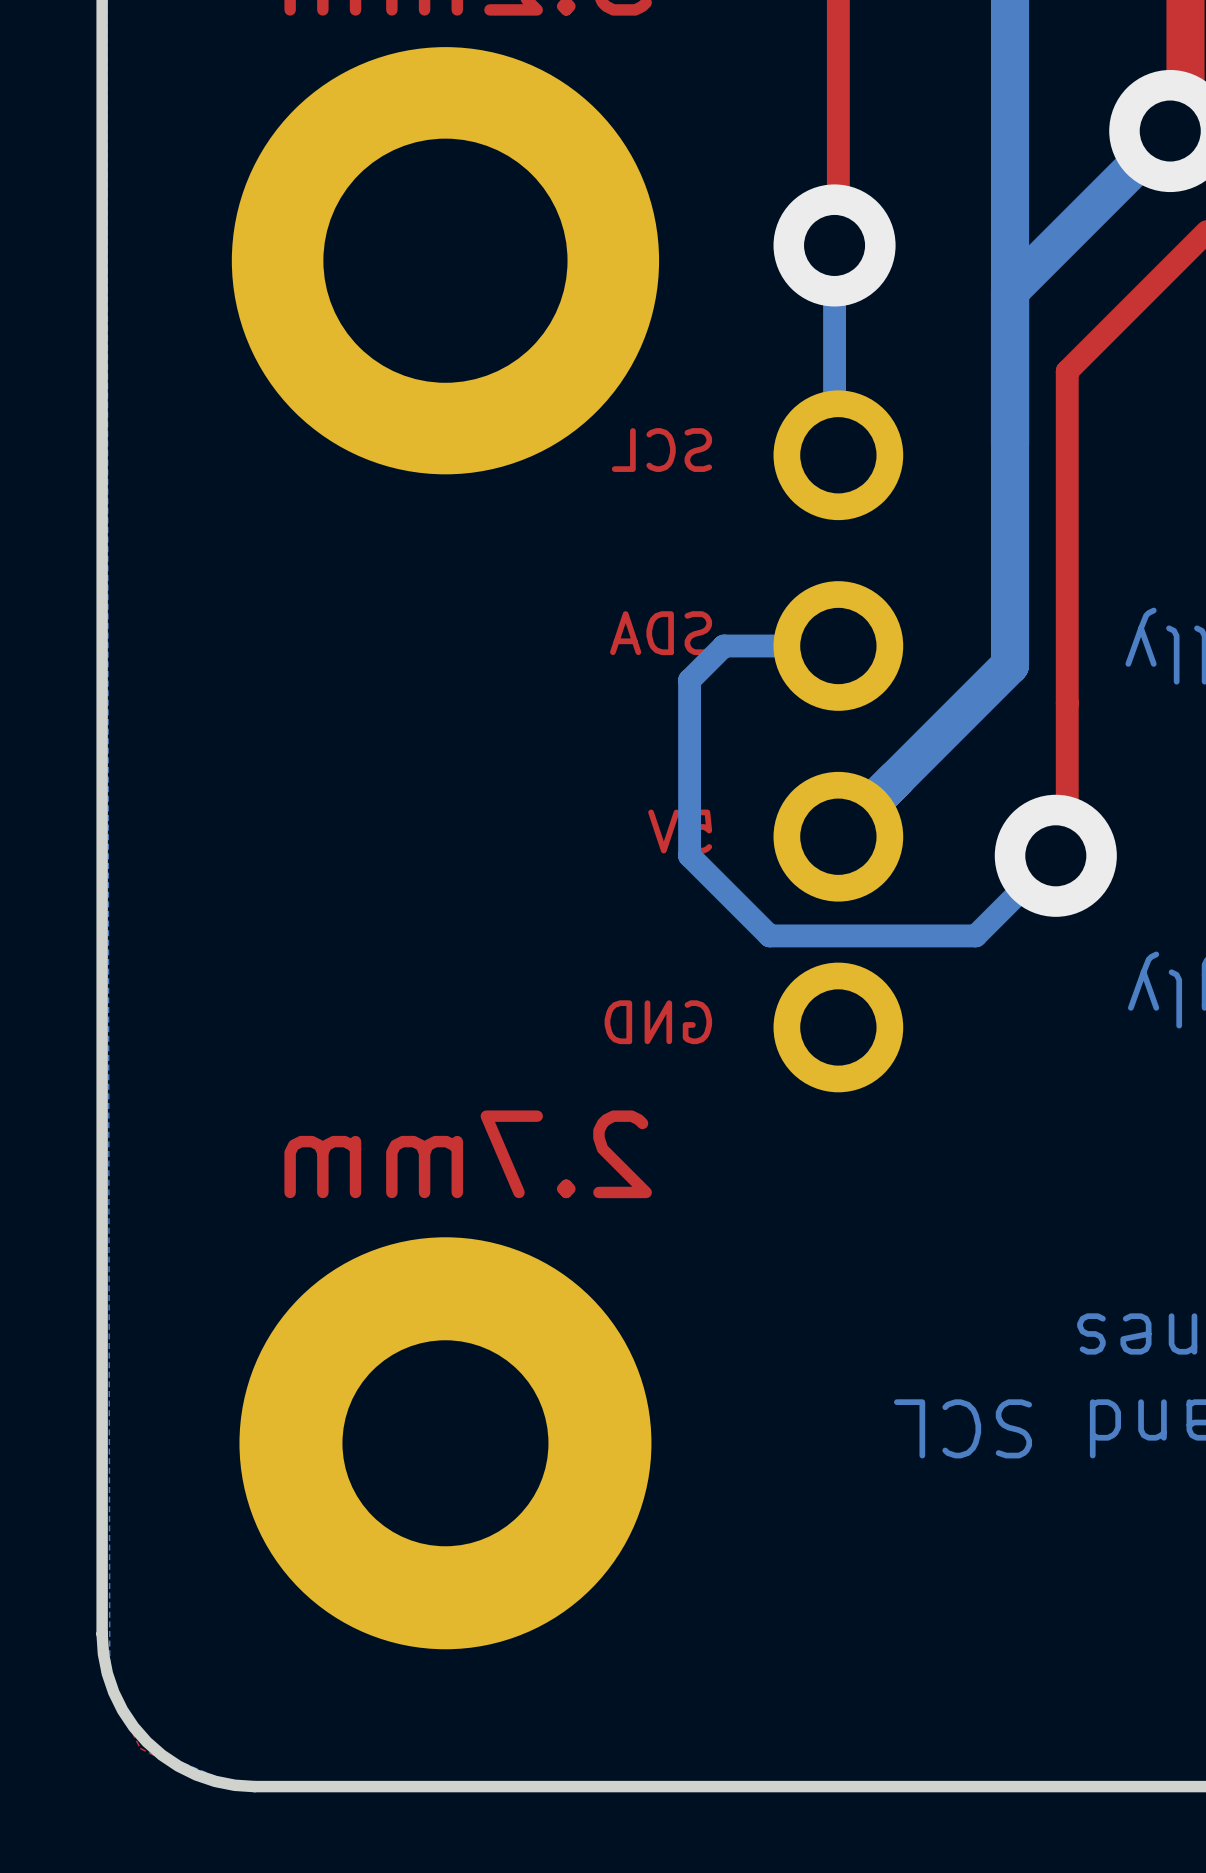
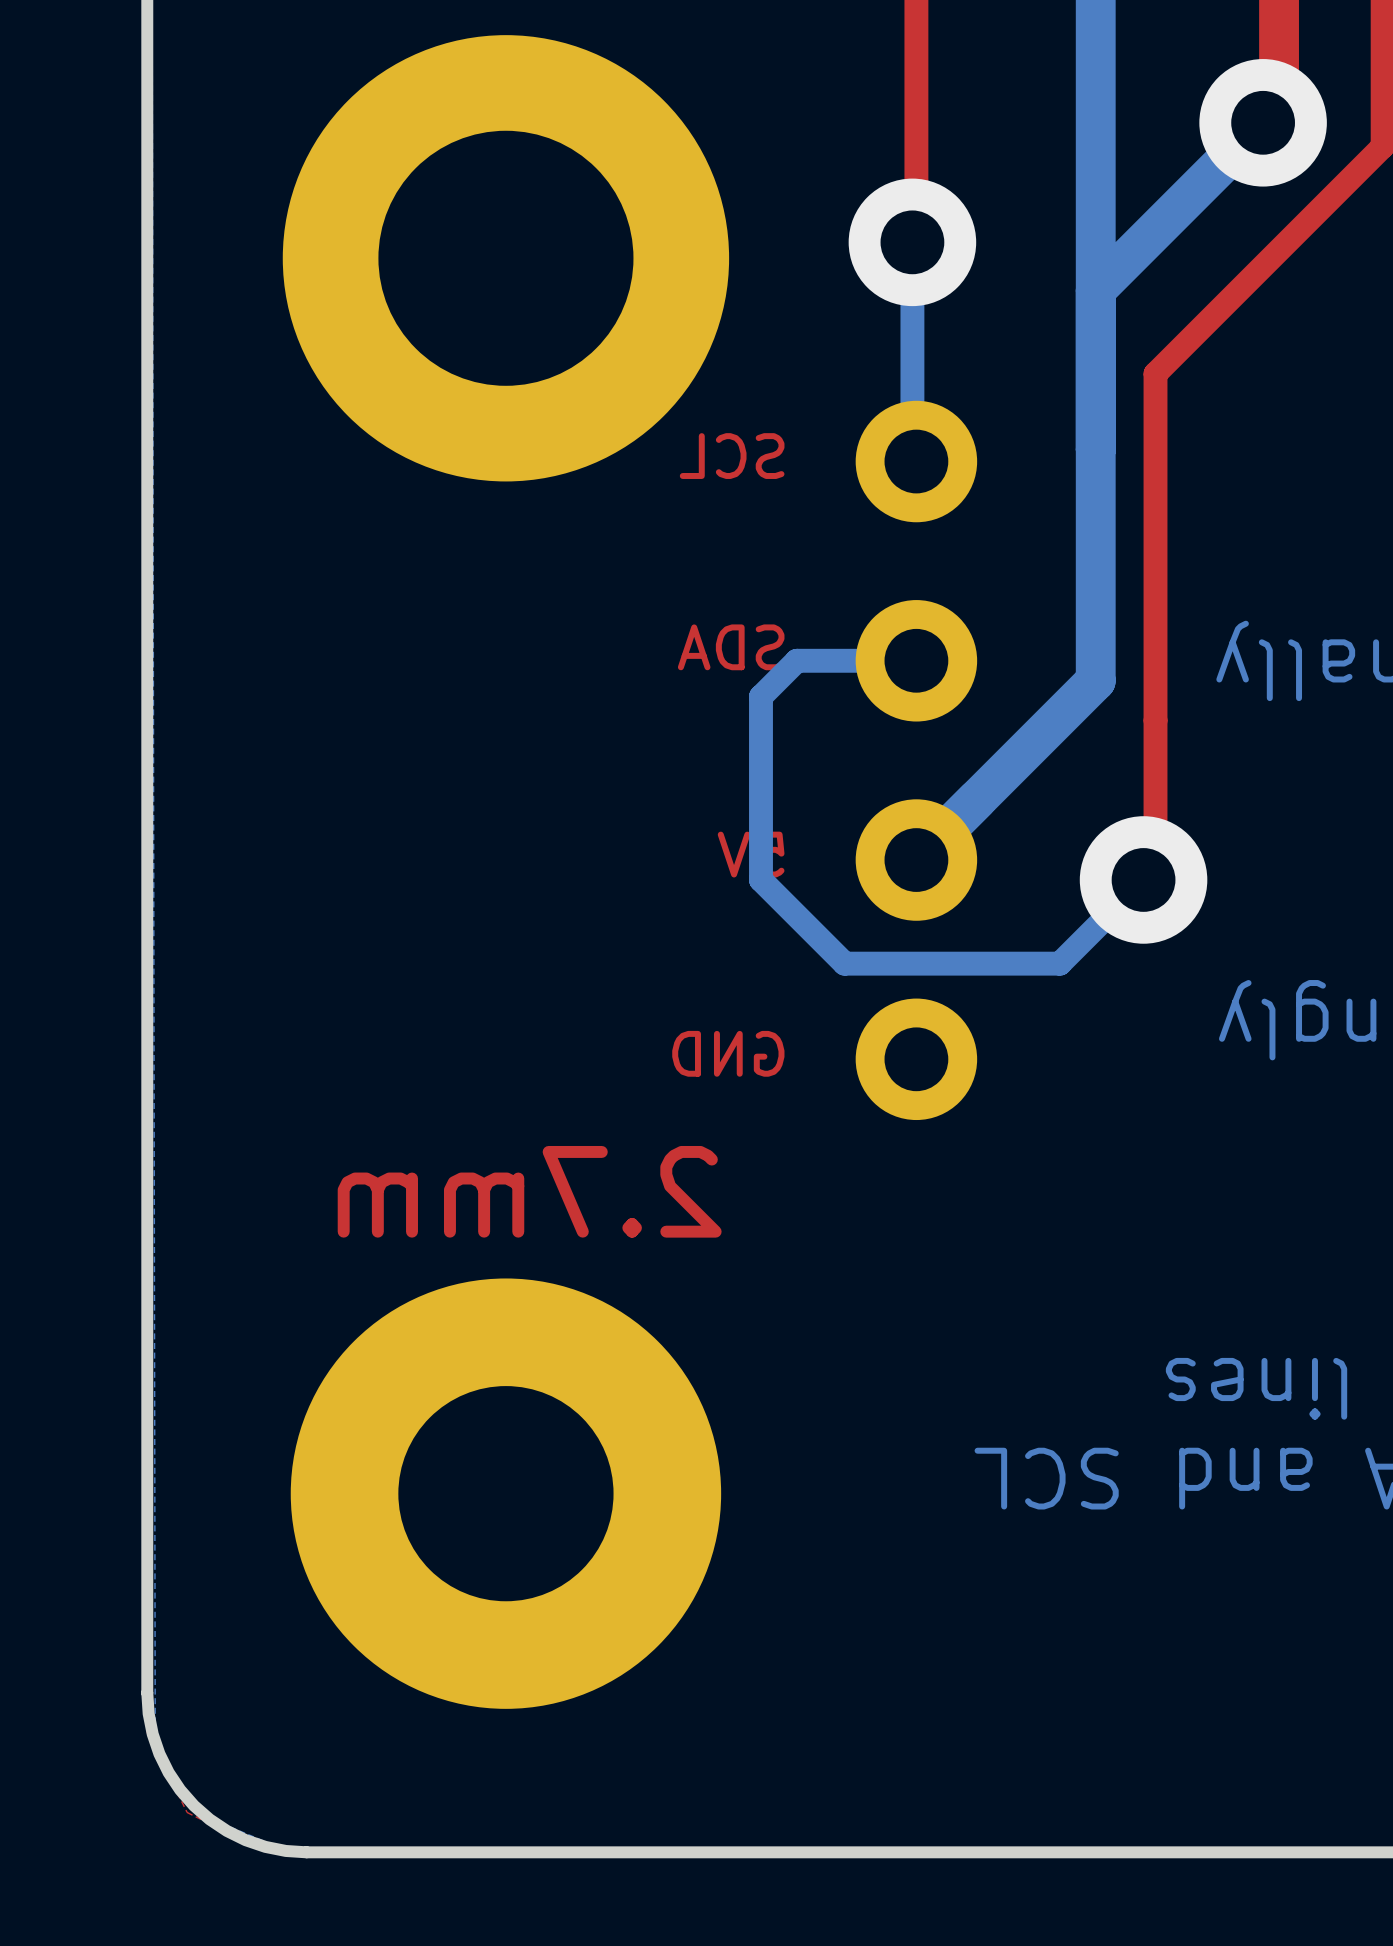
part footprint: [773, 390, 904, 1093] -> [855, 400, 978, 1121]

